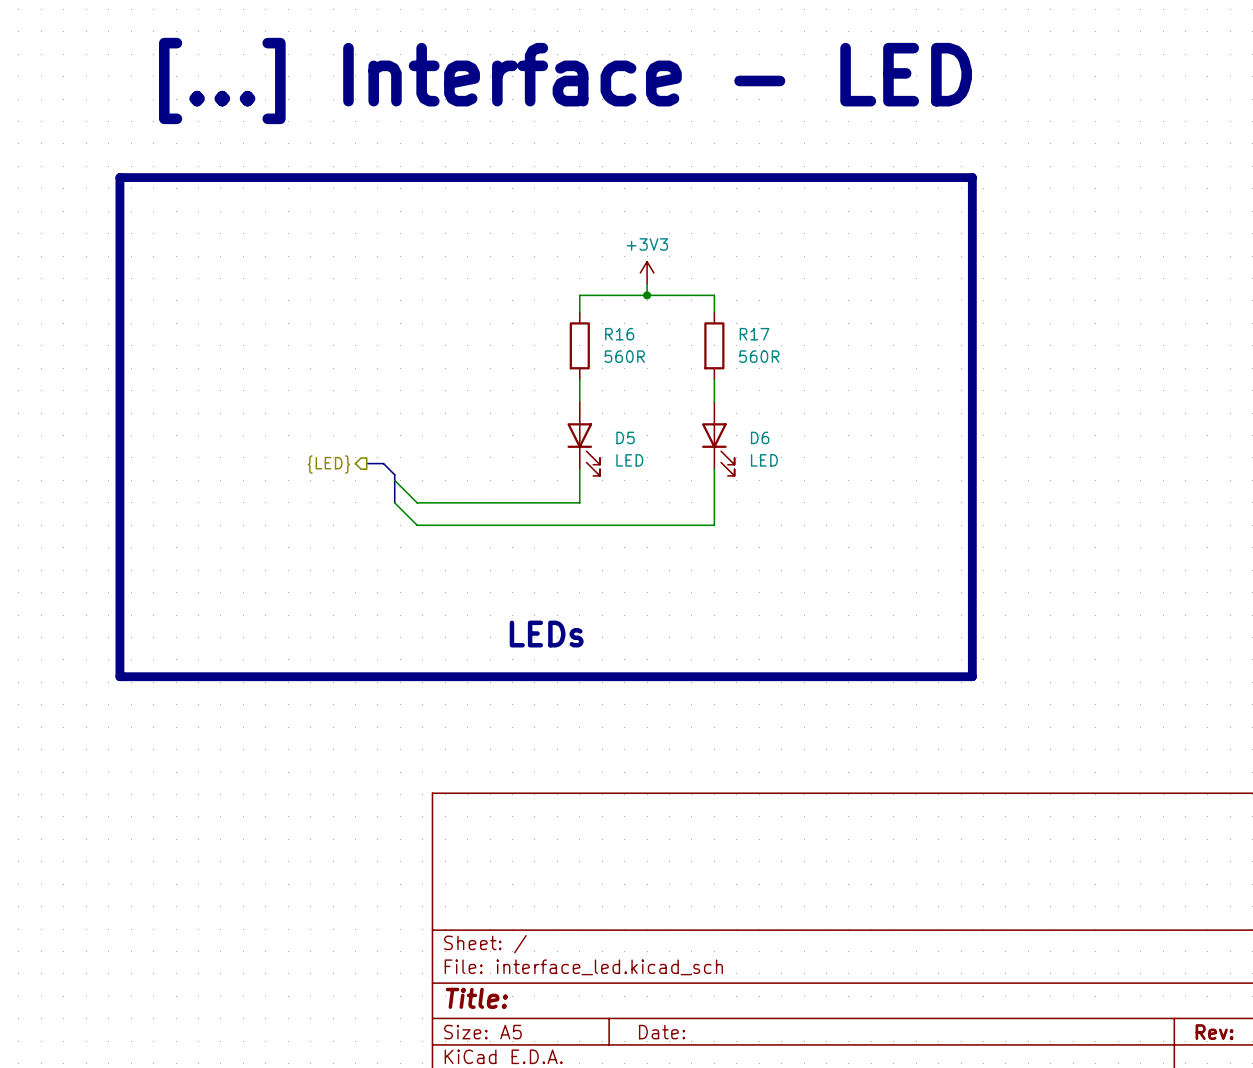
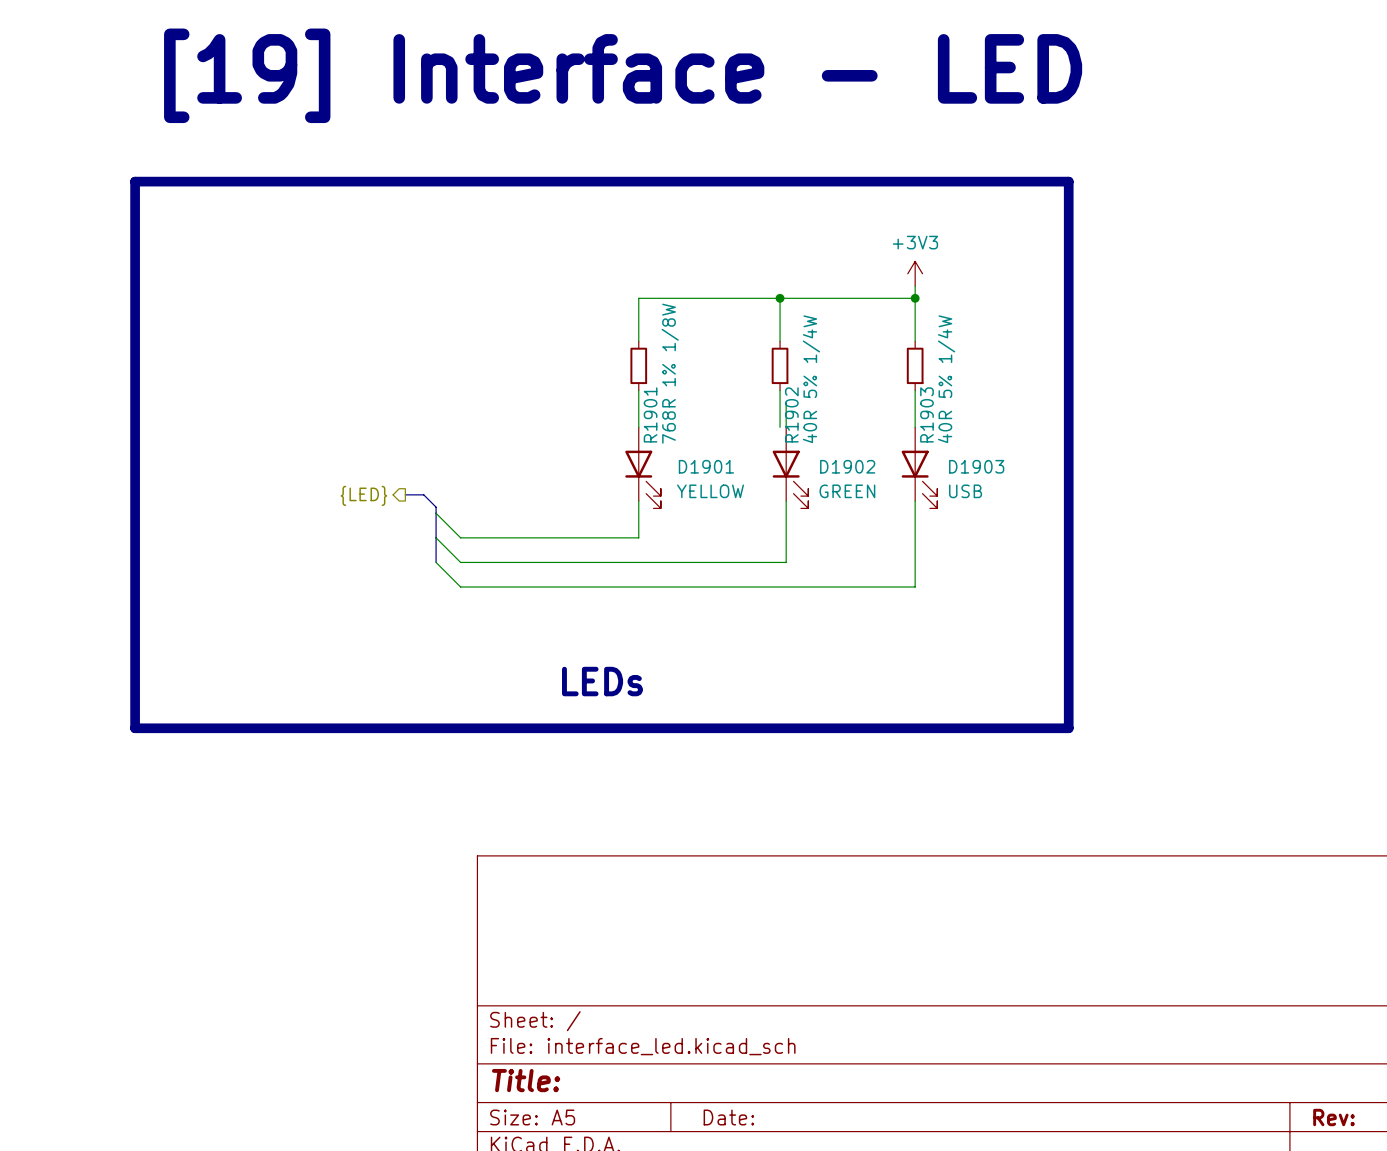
text: [...] Interface - LED (565, 80) -> [19] Interface - LED (623, 75)
power symbol position: +3V3 (647, 272) -> +3V3 (915, 273)
wire: none -> (915, 286) (915, 341)
wire: none -> (780, 298) (780, 341)
junction: none -> (780, 298)
junction: none -> (915, 298)
wire: (579, 295) (714, 295) (714, 312) -> (638, 310) (638, 298) (915, 298)
junction: (647, 295) -> none
R16: 560R (579, 345) -> none
R1901: none -> 768R 1% 1/8W (638, 365)
R1902: none -> 40R 5% 1/4W (780, 365)
R17: 560R (714, 345) -> none
R1903: none -> 40R 5% 1/4W (915, 365)
wire: none -> (780, 390) (780, 427)
wire: none -> (915, 390) (915, 427)
D5 name: D5 (625, 437) -> D1901 (706, 466)
D6 name: D6 (760, 437) -> D1902 (847, 466)
D1903: none -> USB (919, 467)
D5 value: LED (629, 460) -> YELLOW (710, 491)
D6 value: LED (764, 460) -> GREEN (847, 491)
wire: none -> (915, 501) (915, 587) (460, 587) (436, 562)
bus: none -> (436, 537) (436, 562)

